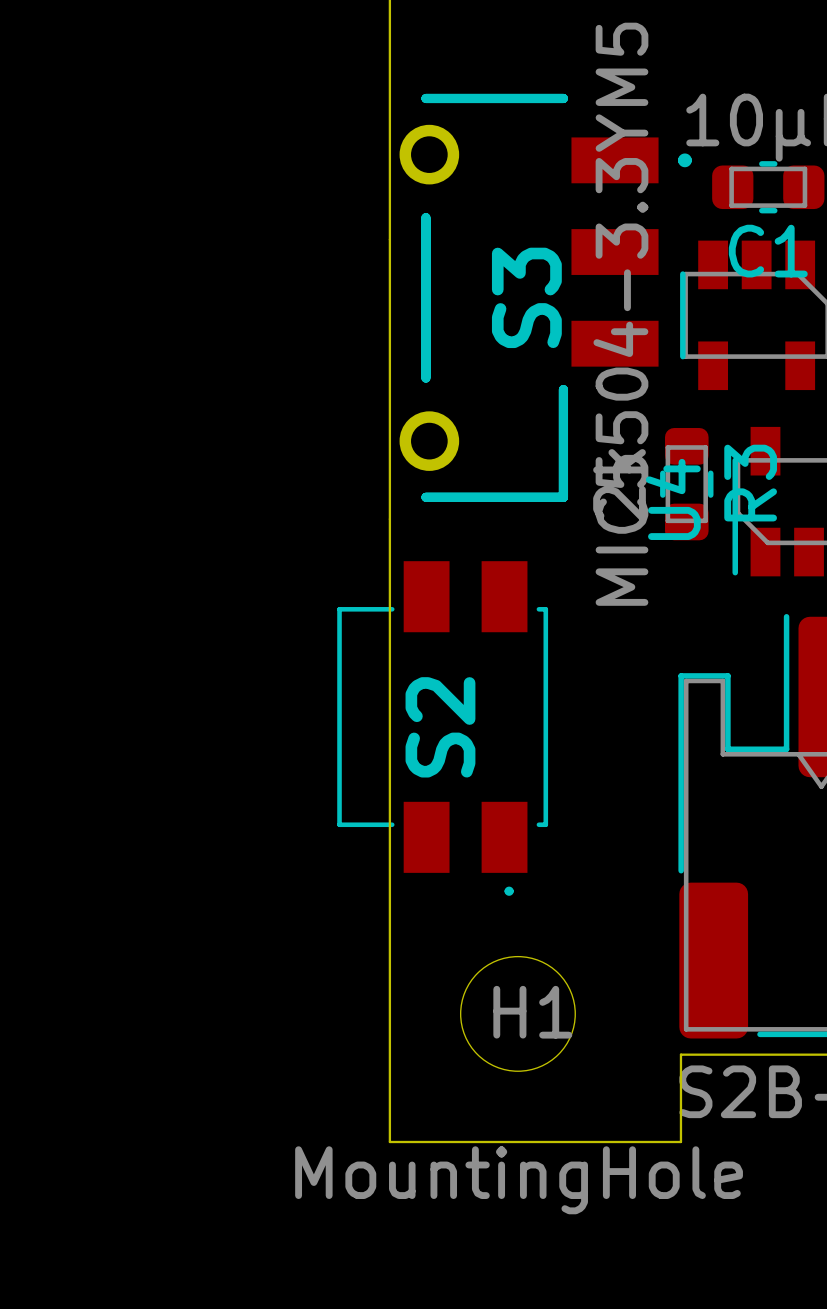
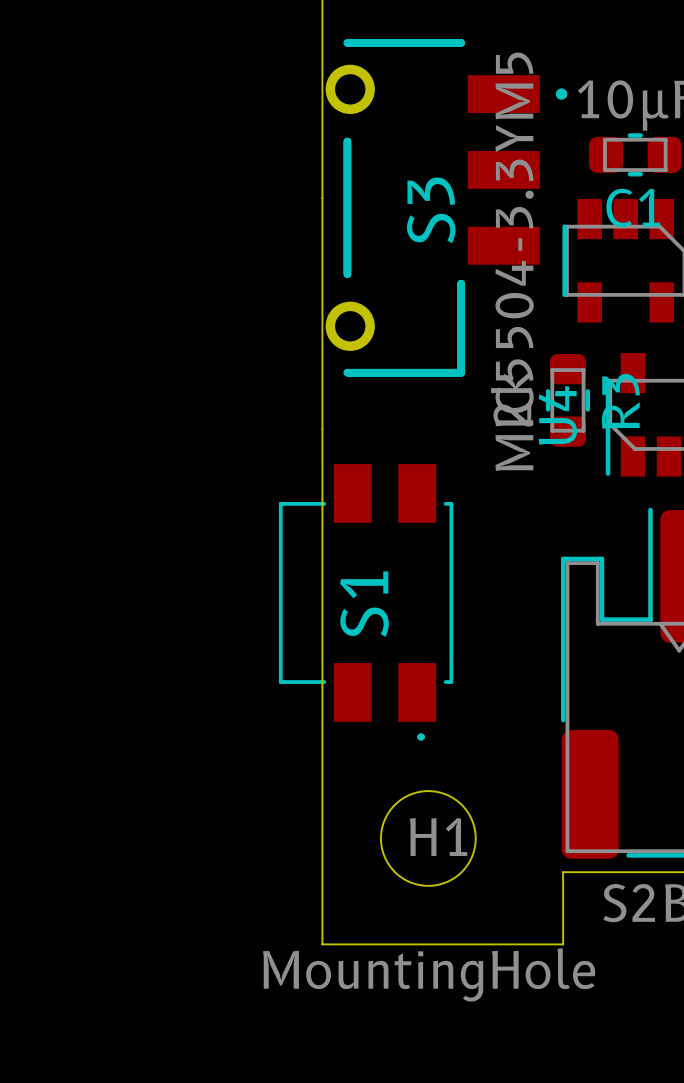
S3 position: (545, 297) -> (446, 207)
S2 name: S2 (440, 727) -> S1 (364, 604)

